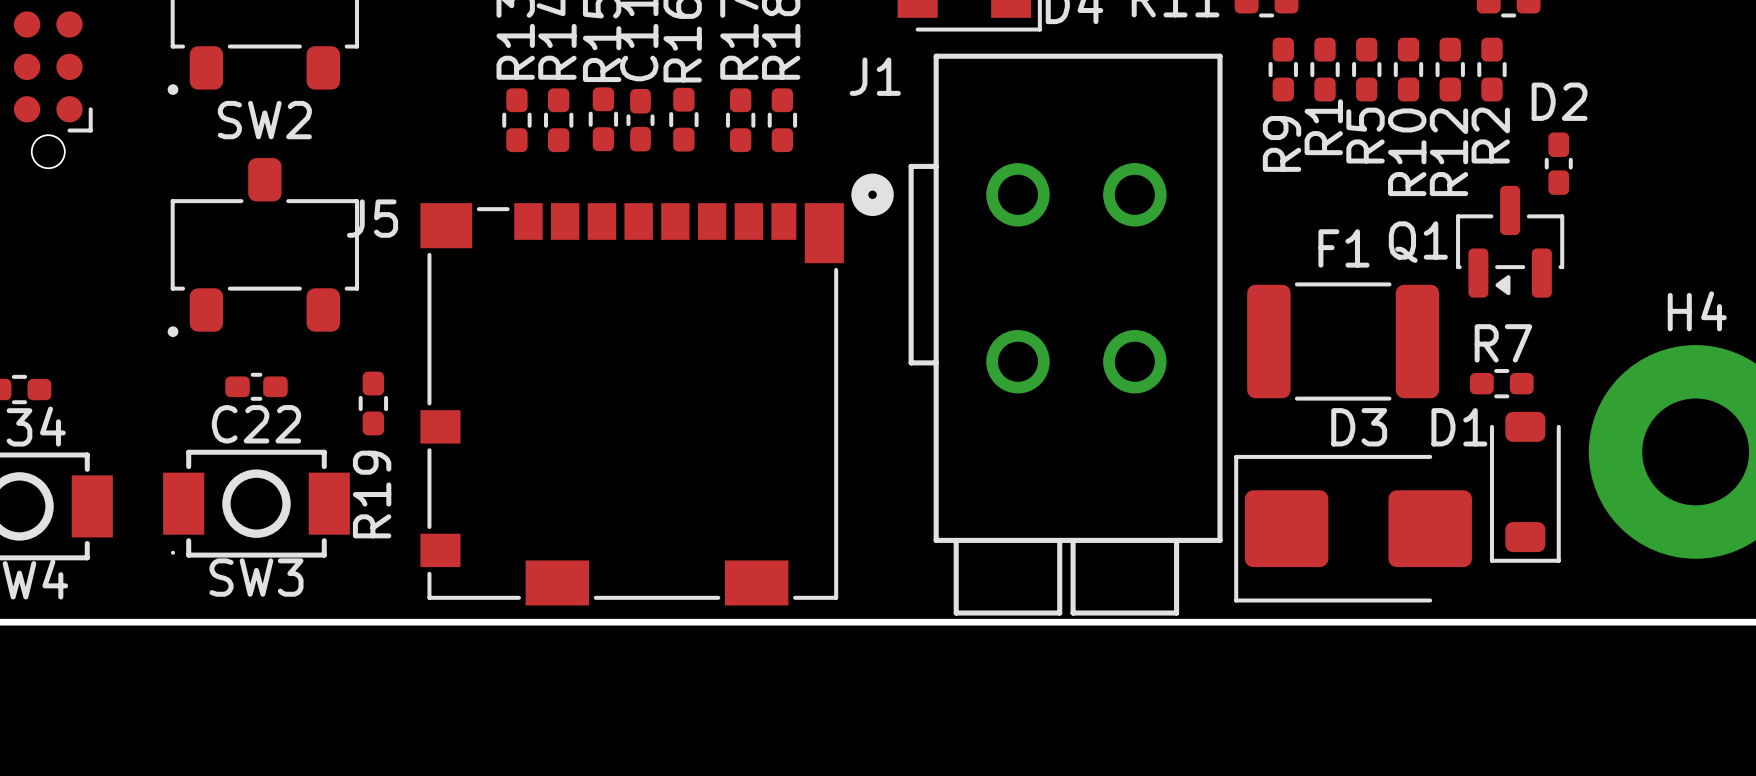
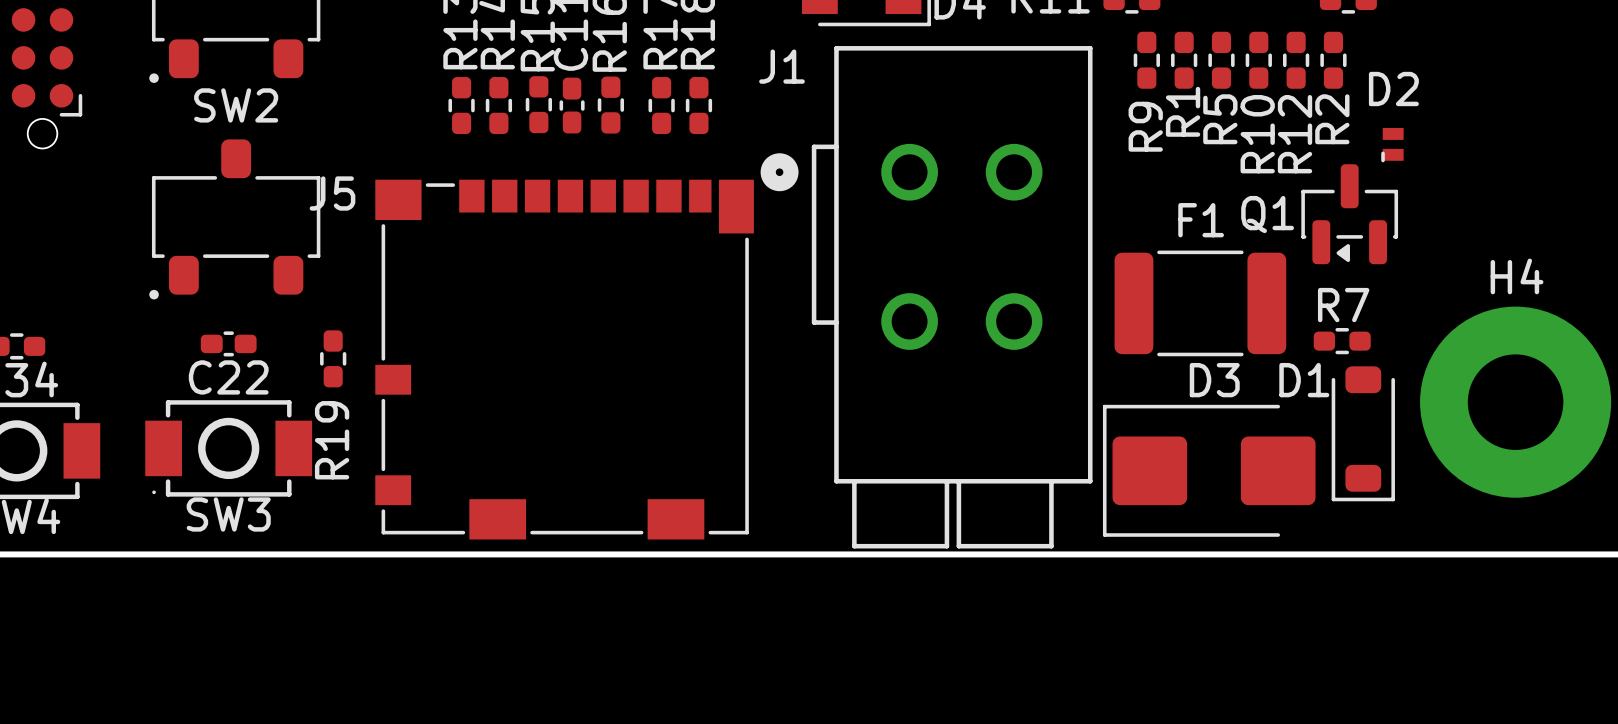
D2 footprint: [1544, 132, 1573, 195] -> [1381, 127, 1404, 163]

